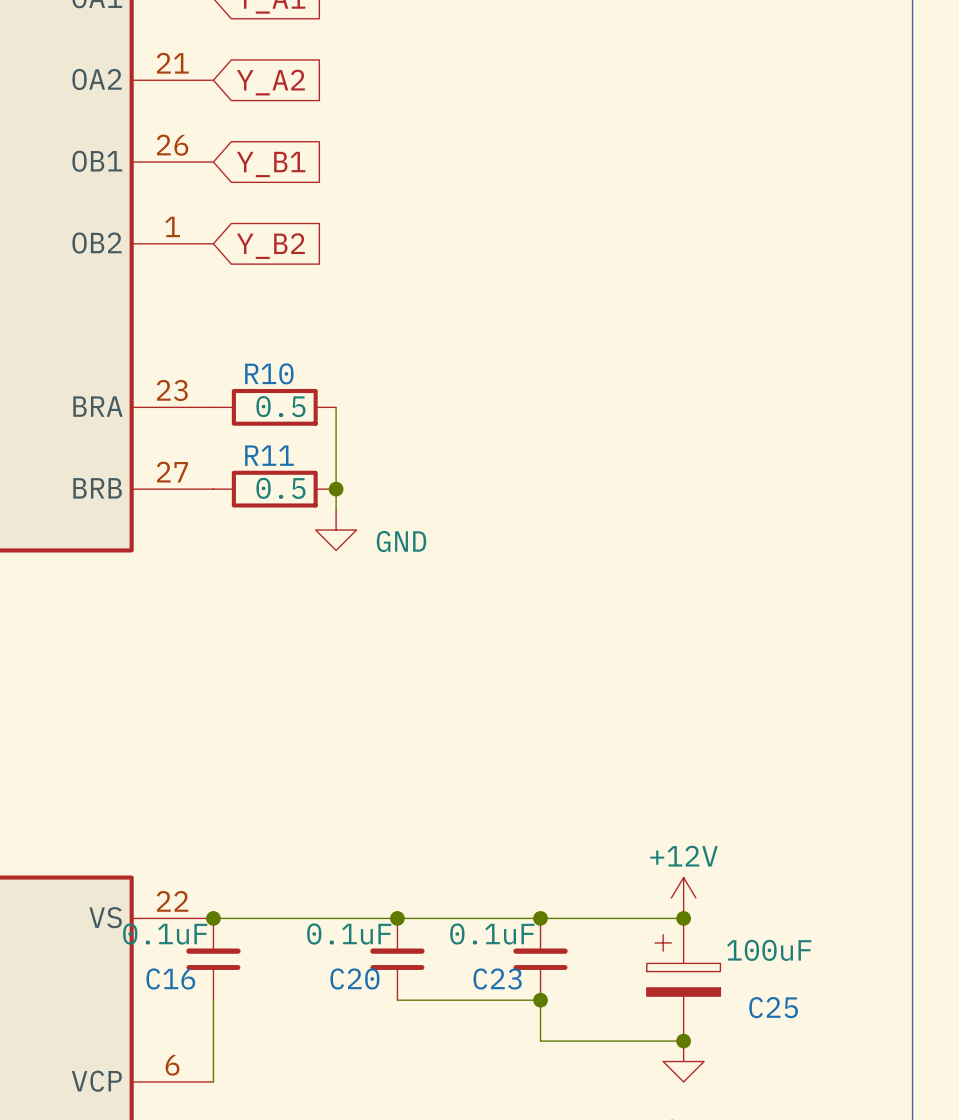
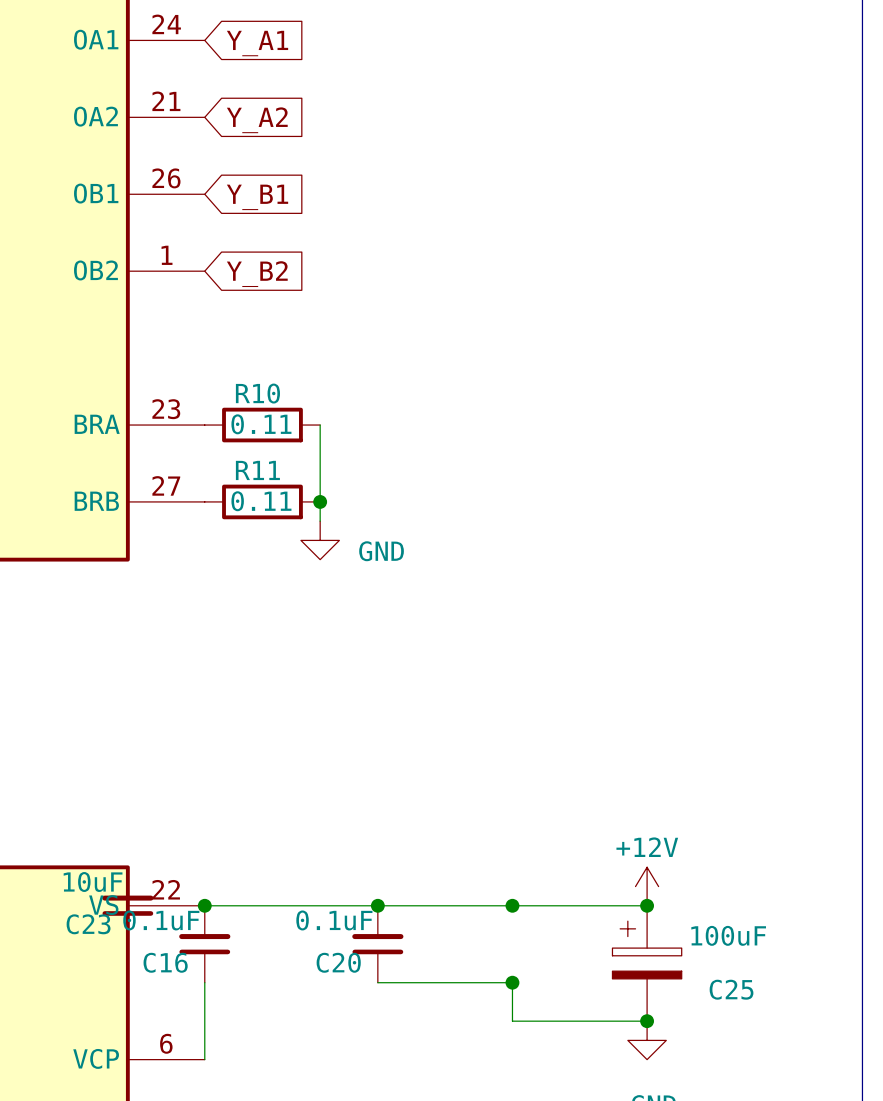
R10 value: 0.5 (280, 406) -> 0.11 (261, 424)
R11 value: 0.5 (280, 488) -> 0.11 (261, 501)
C23 value: 0.1uF (492, 934) -> 10uF (93, 882)
C23 position: (540, 959) -> (127, 905)

